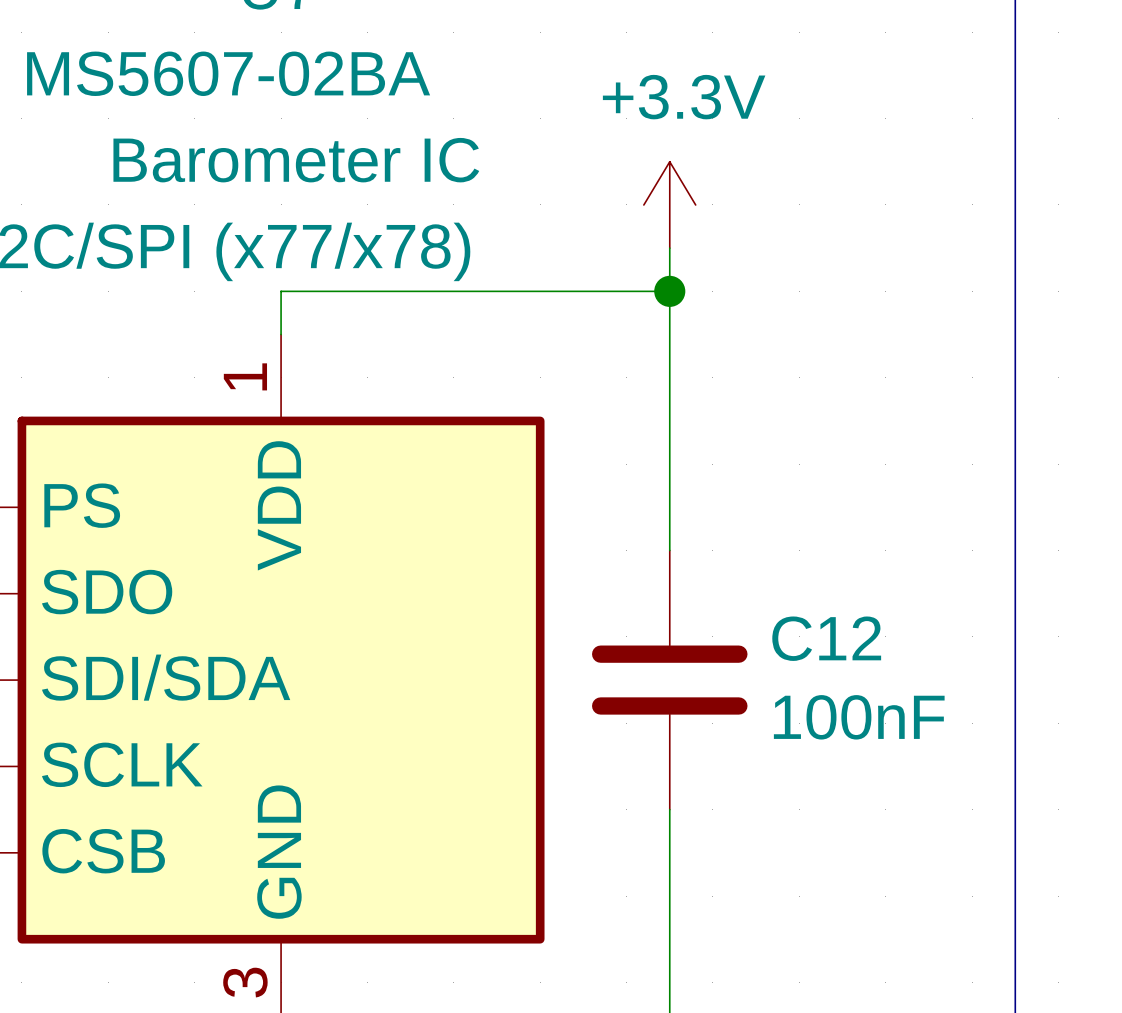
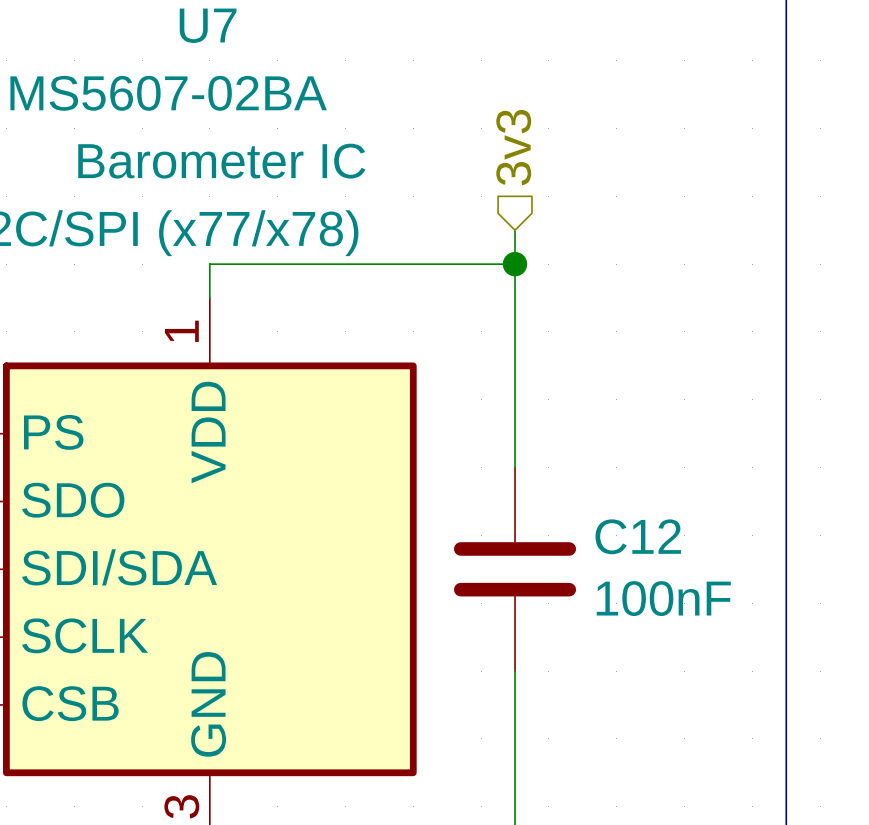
hierarchical label: none -> 3v3 (513, 147)
power symbol: +3.3V (669, 204) -> none

